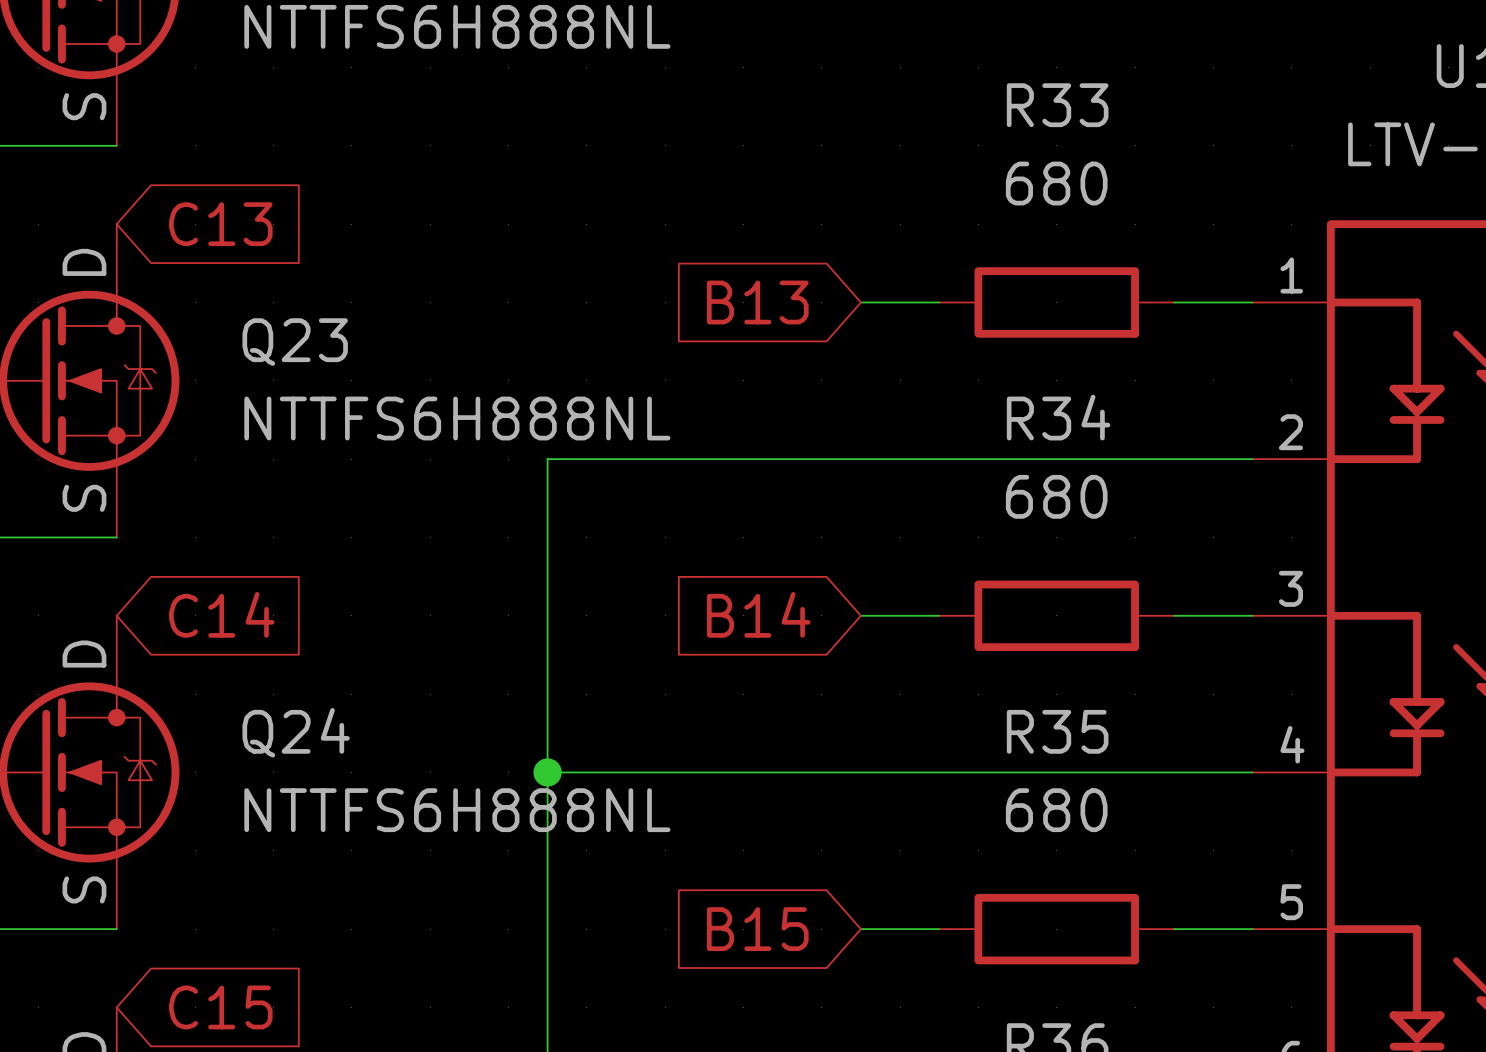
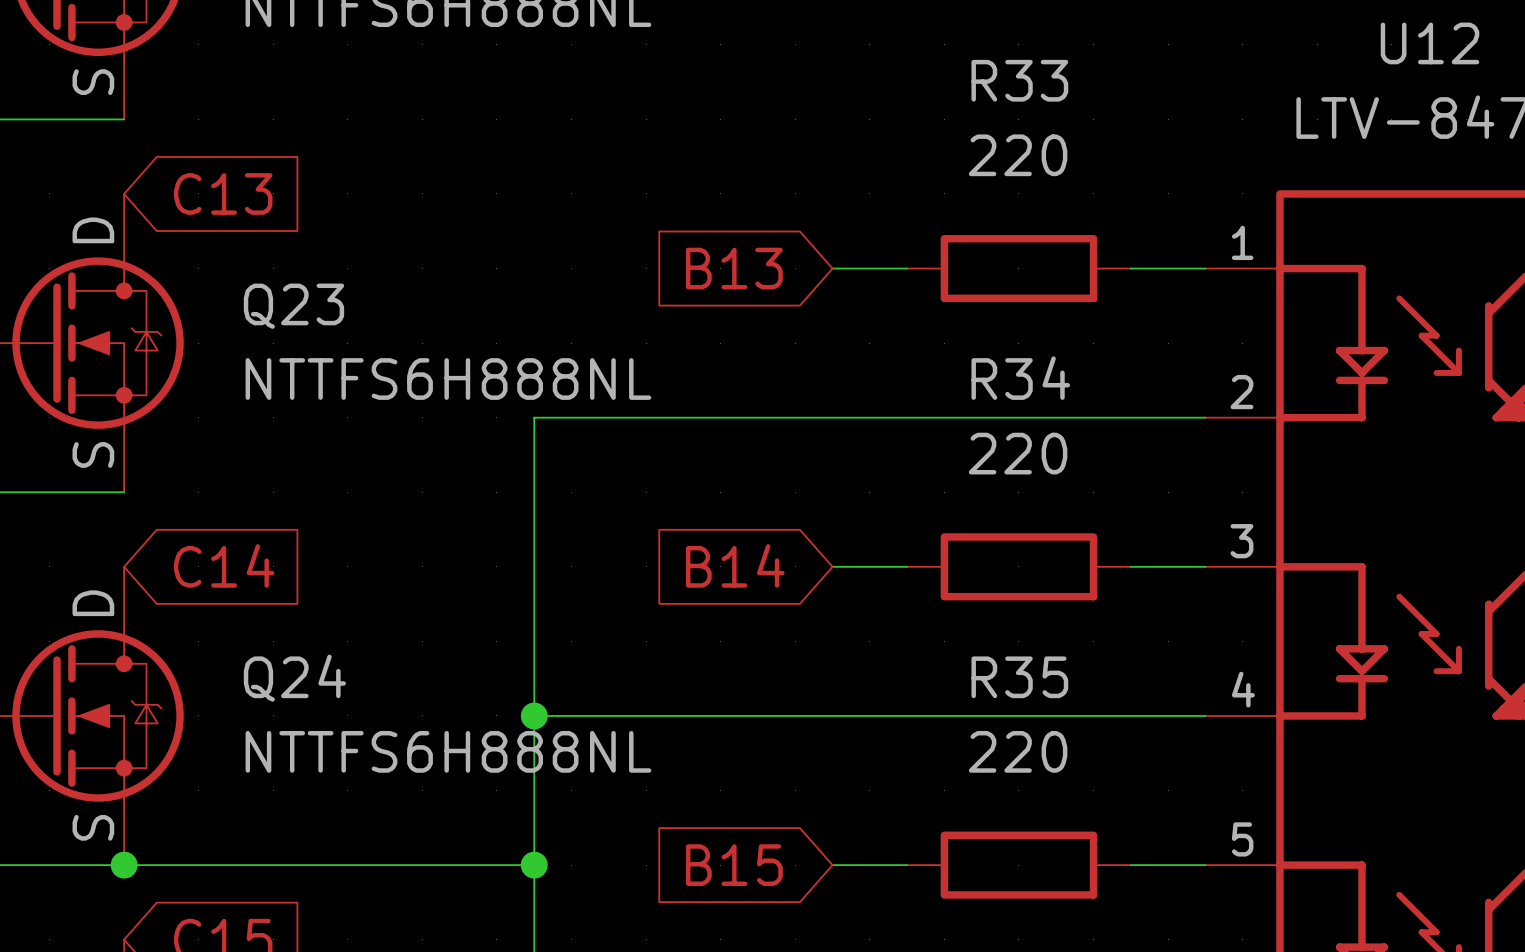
R33 value: 680 (1056, 183) -> 220 (1018, 155)
R34 value: 680 (1056, 496) -> 220 (1018, 453)
R35 value: 680 (1056, 810) -> 220 (1018, 751)
wire: none -> (124, 865) (534, 865)
junction: none -> (124, 865)
junction: none -> (534, 865)

